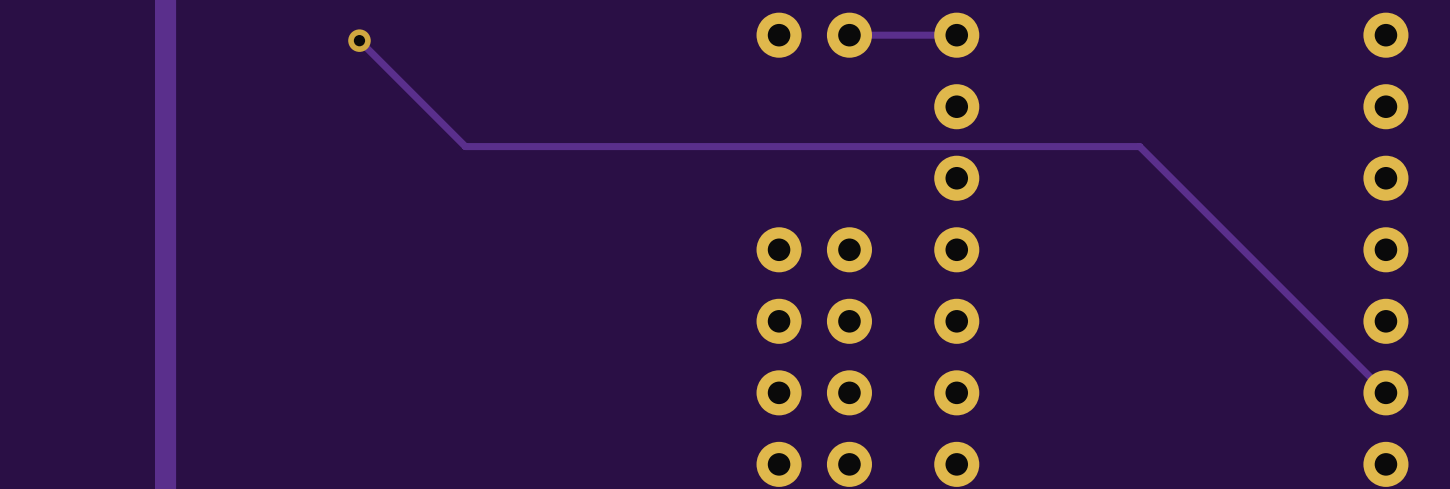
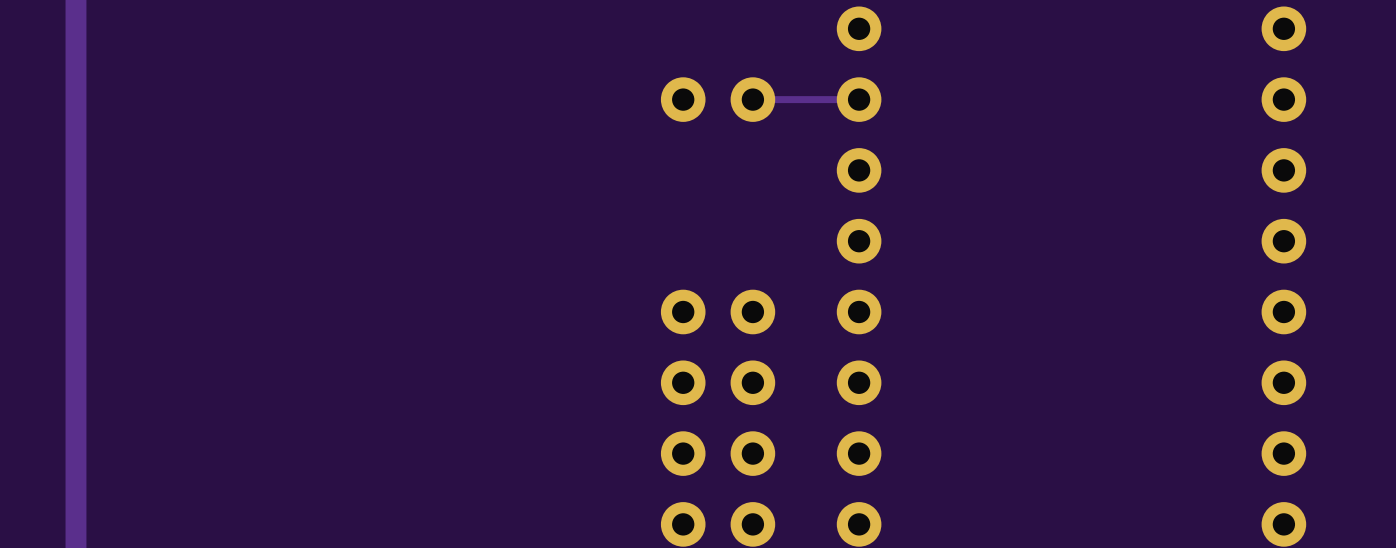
track: (359, 40) (465, 146) (1139, 146) (1385, 392) -> none
via: (359, 40) -> none

